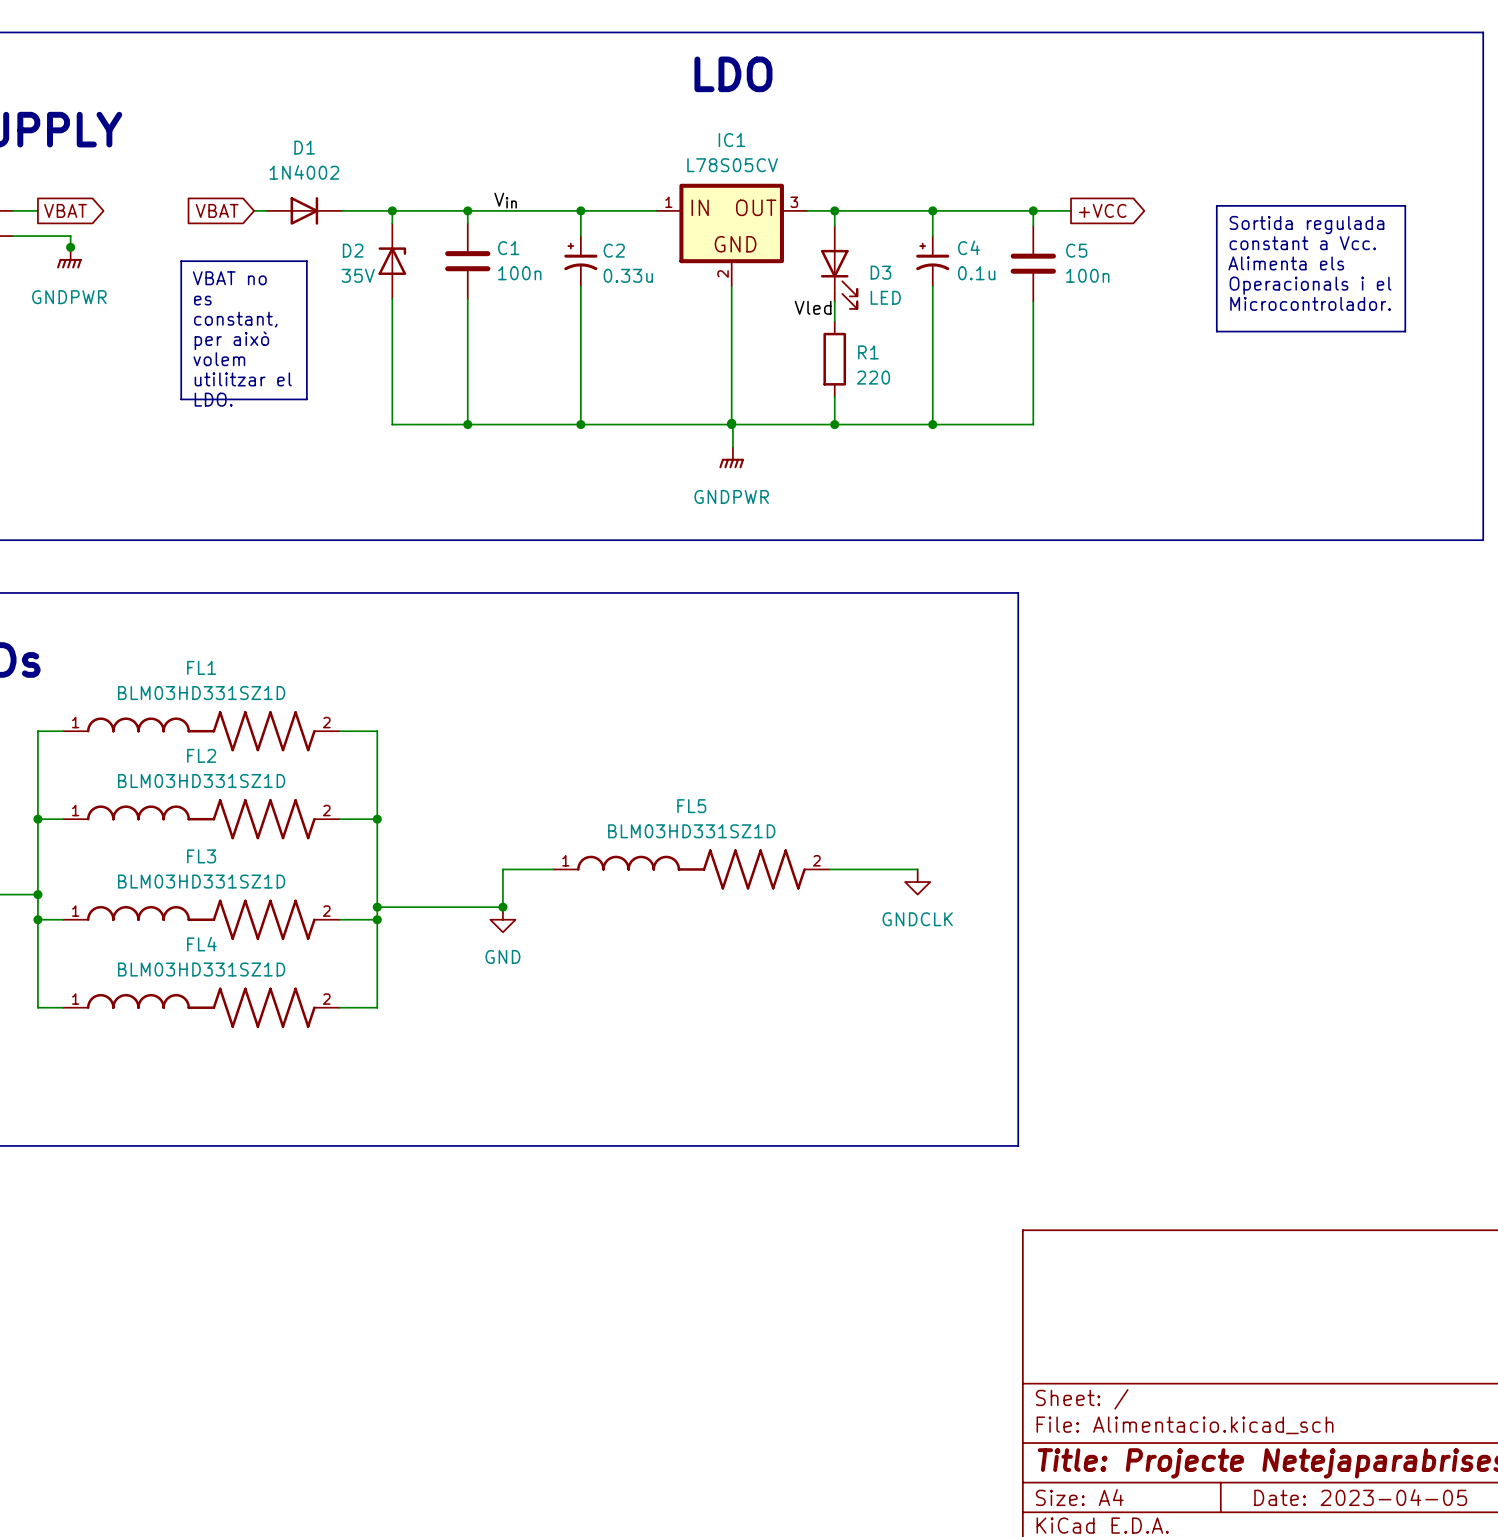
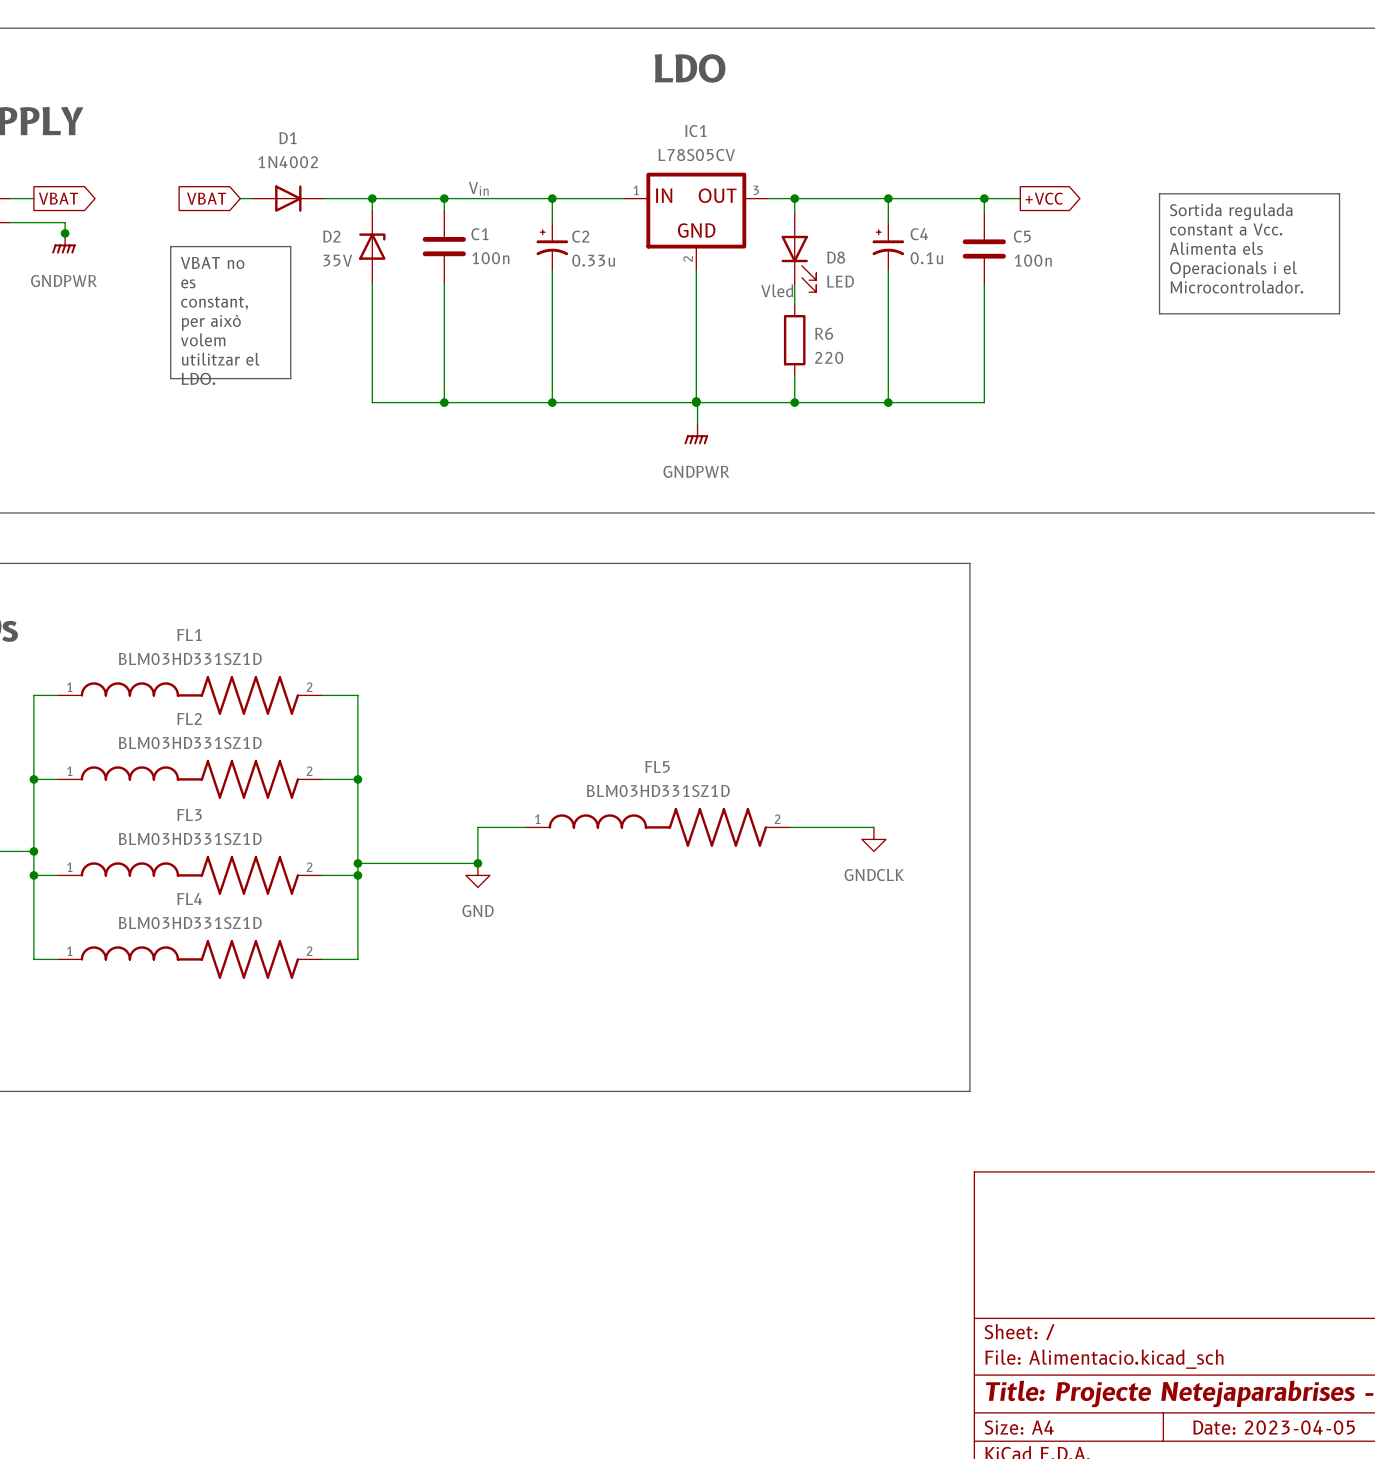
D3 name: D3 (880, 272) -> D8 (836, 257)
R1 name: R1 (868, 352) -> R6 (824, 333)

